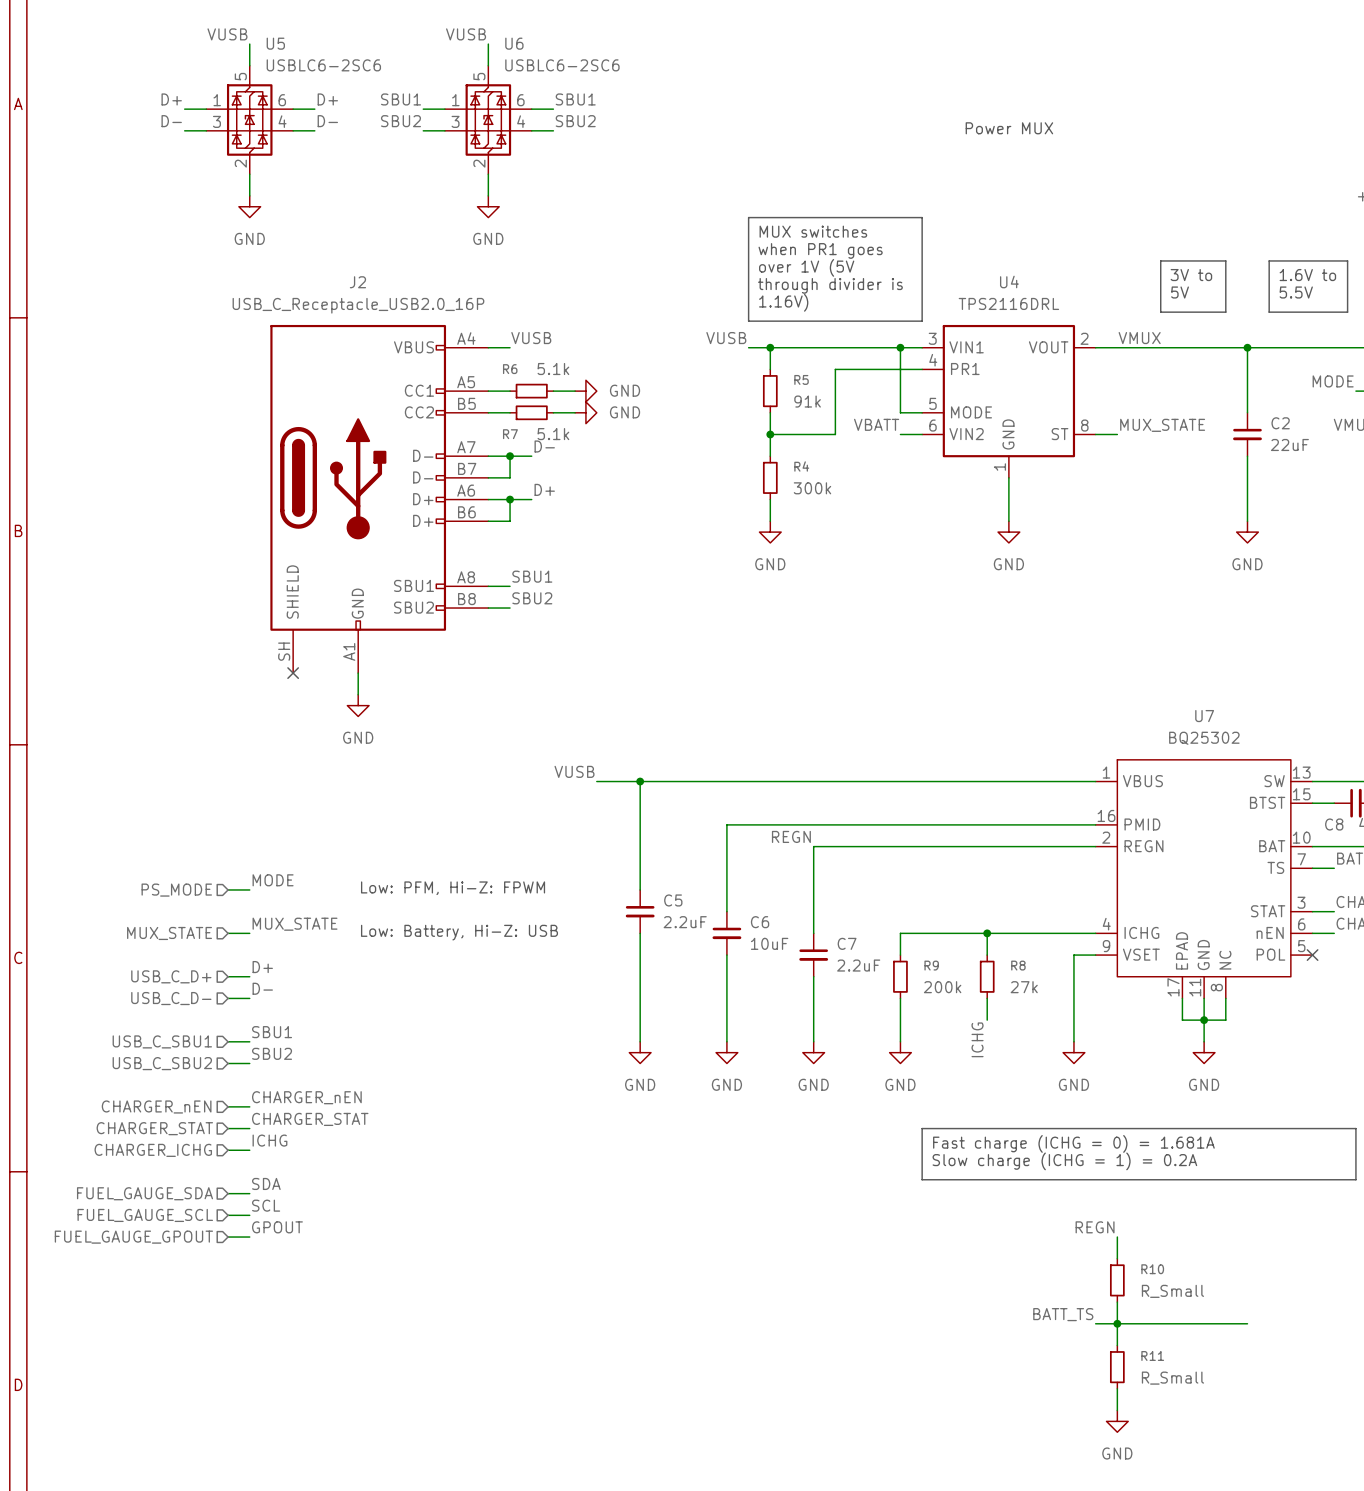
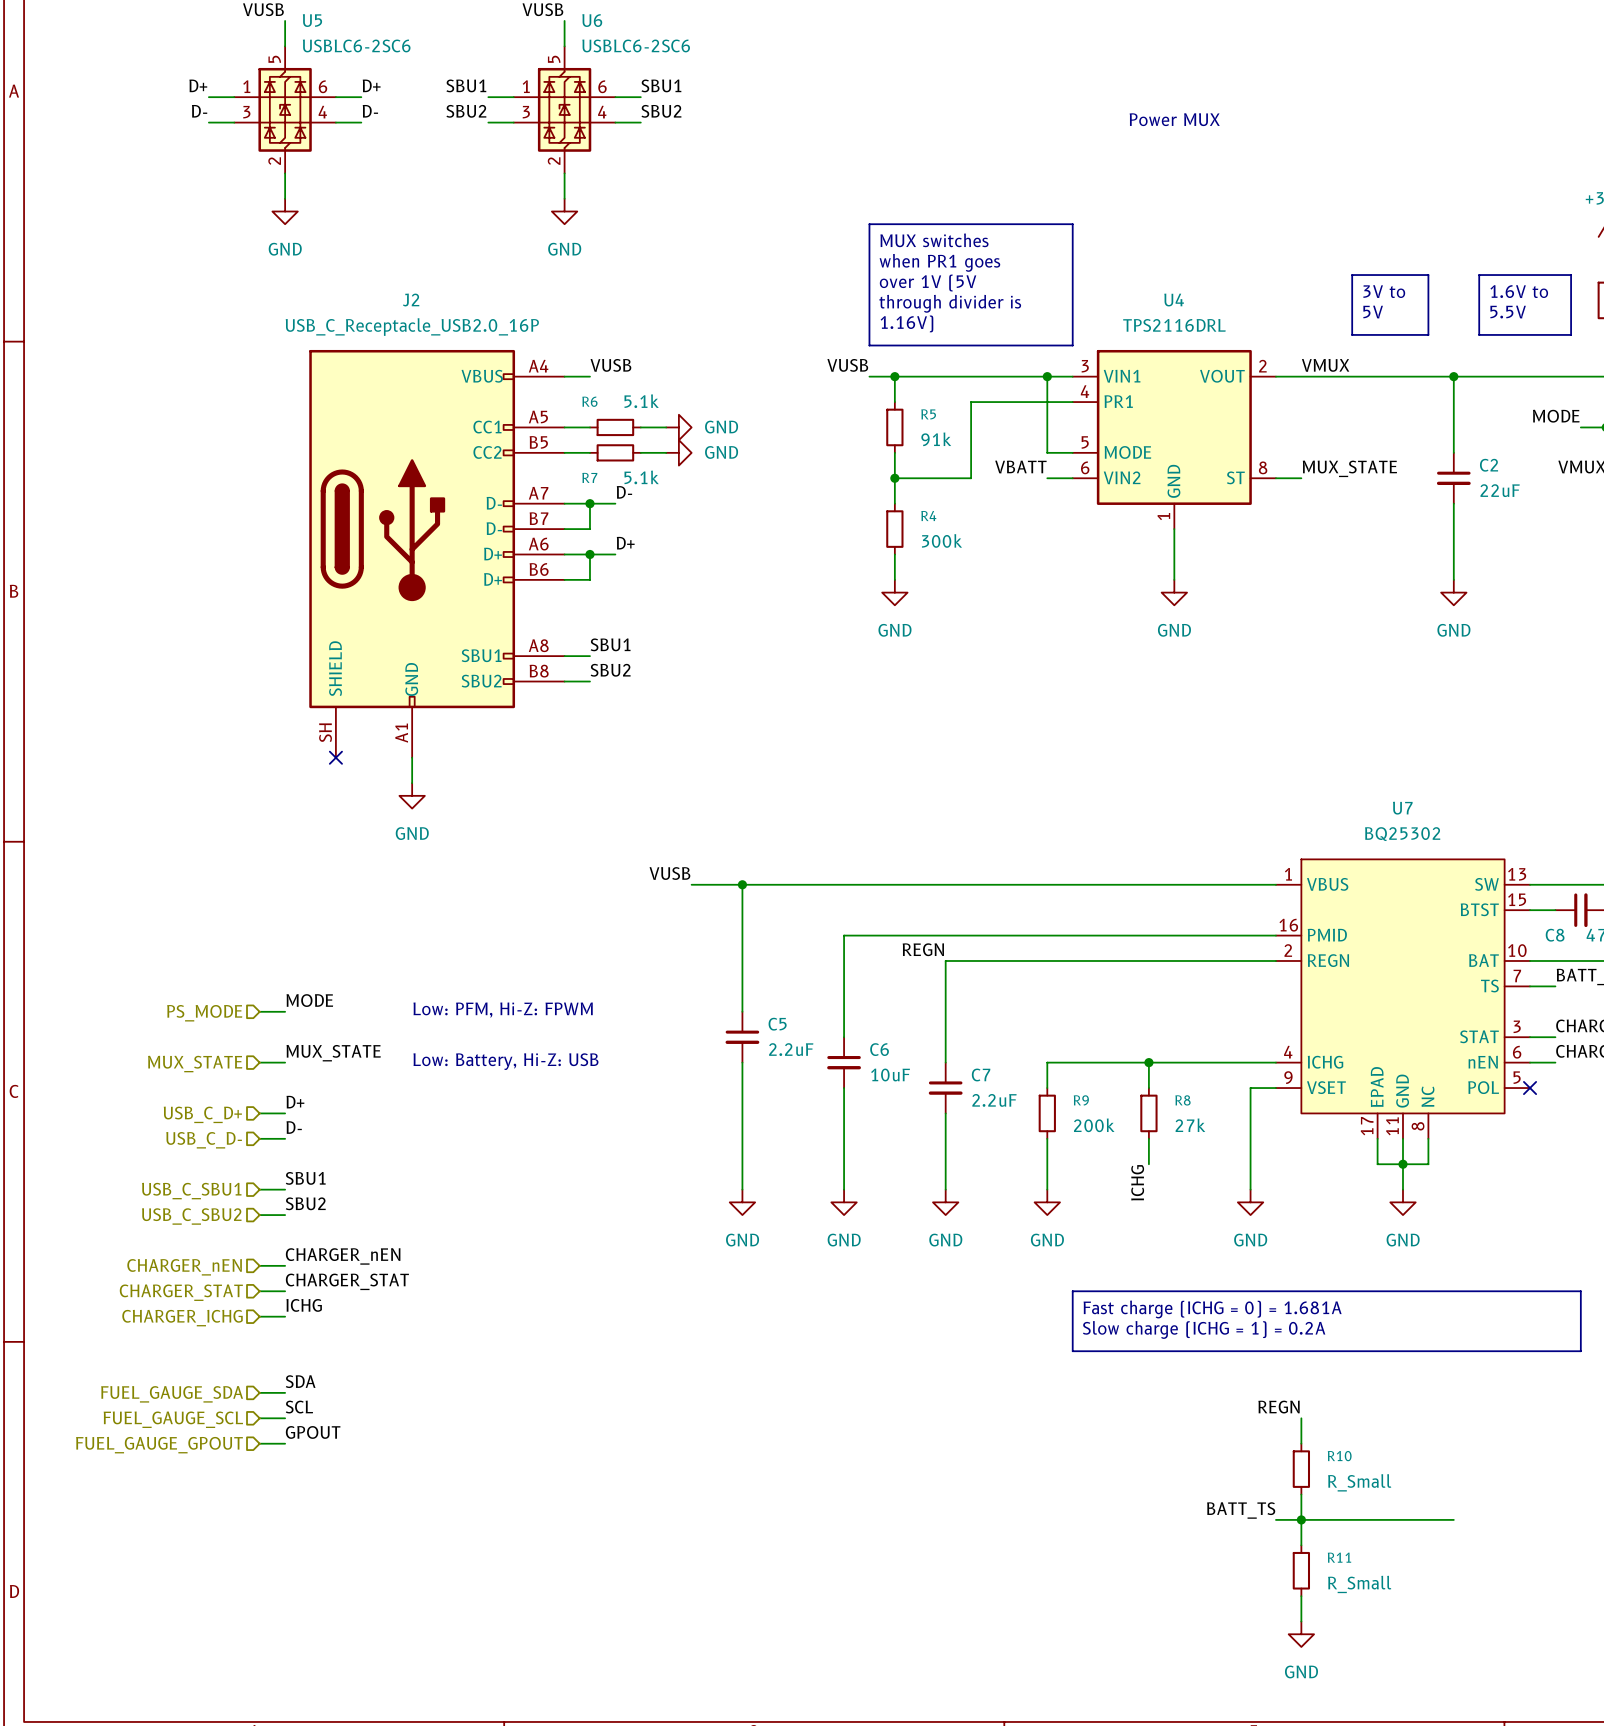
label: SDA (266, 1183) -> none
hierarchical label: FUEL_GAUGE_SDA (145, 1193) -> none
wire: (228, 1193) (249, 1193) -> (259, 1443) (285, 1443)
label: SCL (266, 1205) -> SDA (300, 1381)
hierarchical label: FUEL_GAUGE_SCL (145, 1215) -> FUEL_GAUGE_SDA (172, 1394)
label: GPOUT (277, 1227) -> SCL (299, 1407)
hierarchical label: FUEL_GAUGE_GPOUT (133, 1237) -> FUEL_GAUGE_SCL (173, 1419)
label: none -> GPOUT (313, 1432)
hierarchical label: none -> FUEL_GAUGE_GPOUT (159, 1445)

